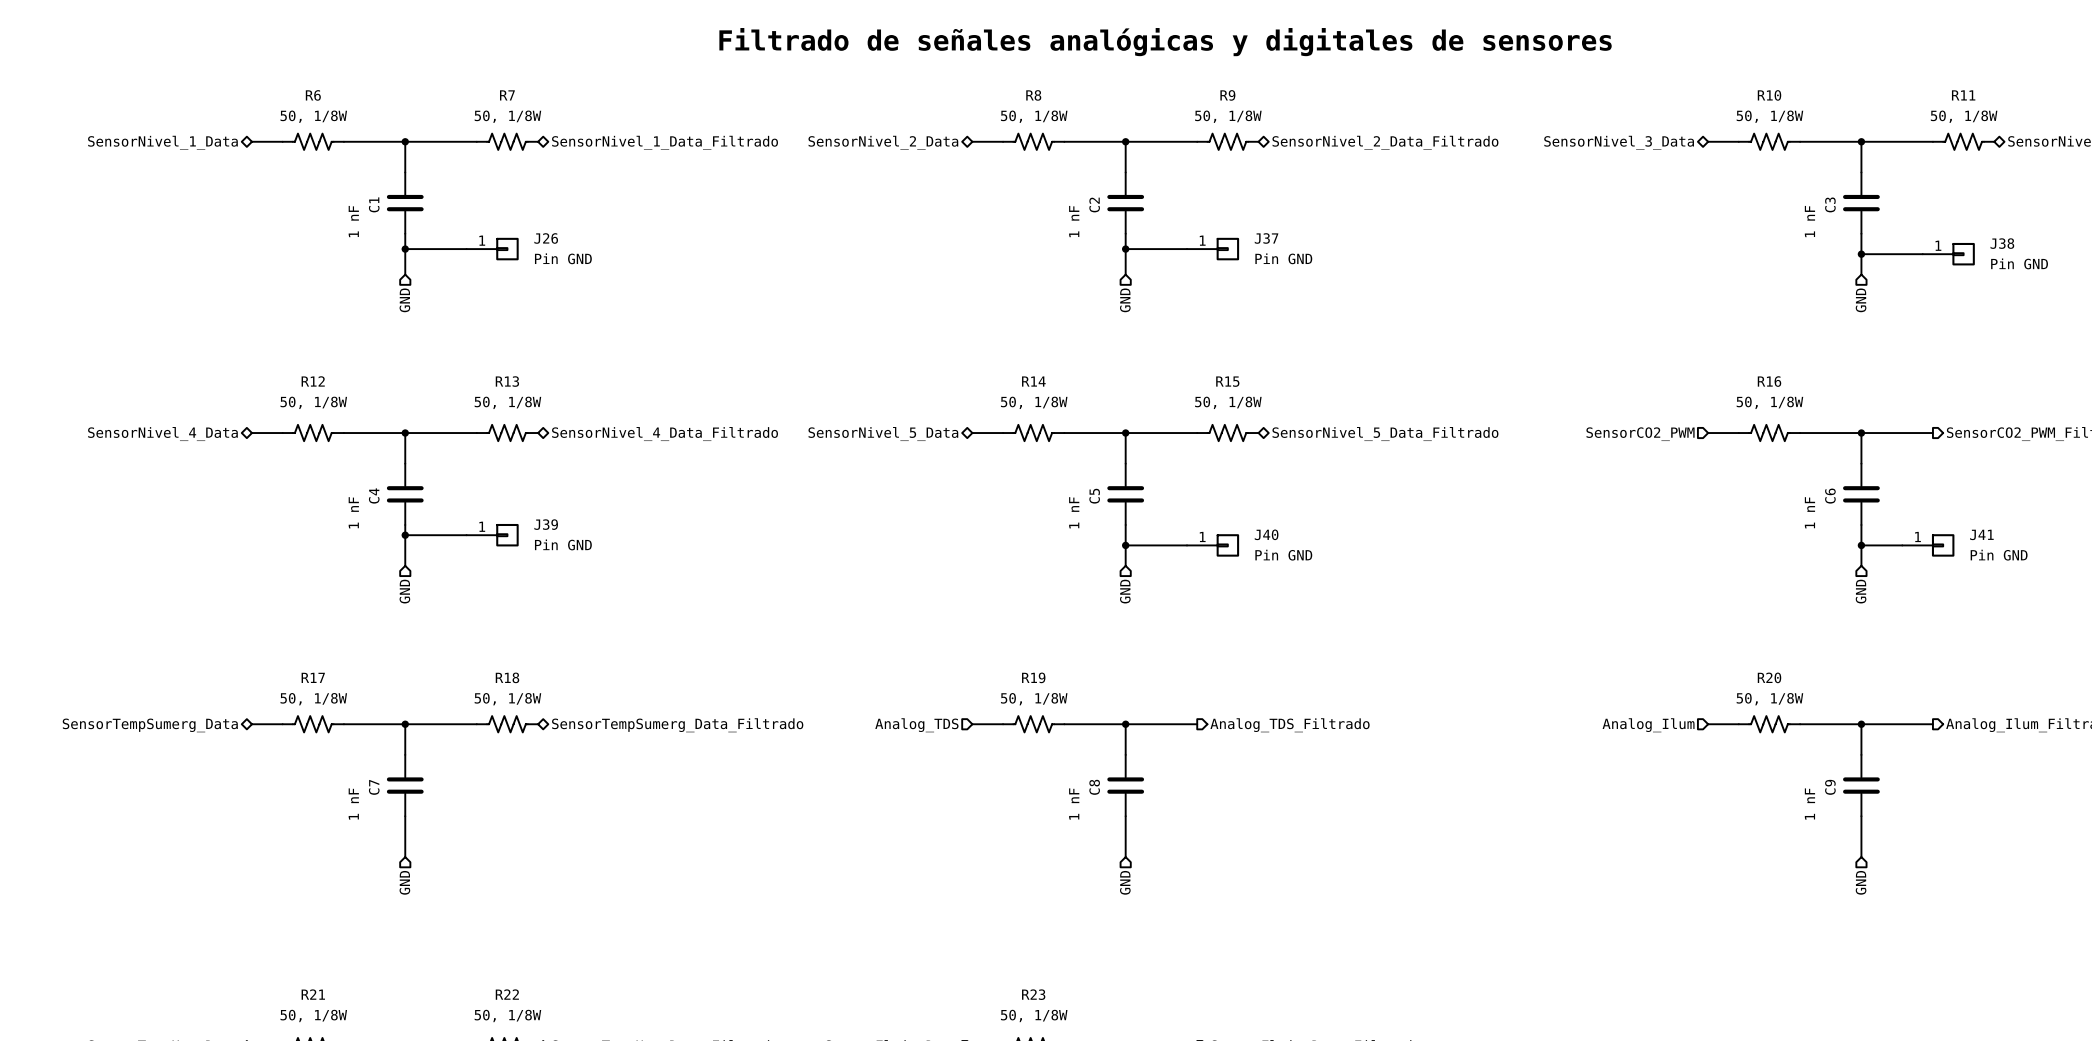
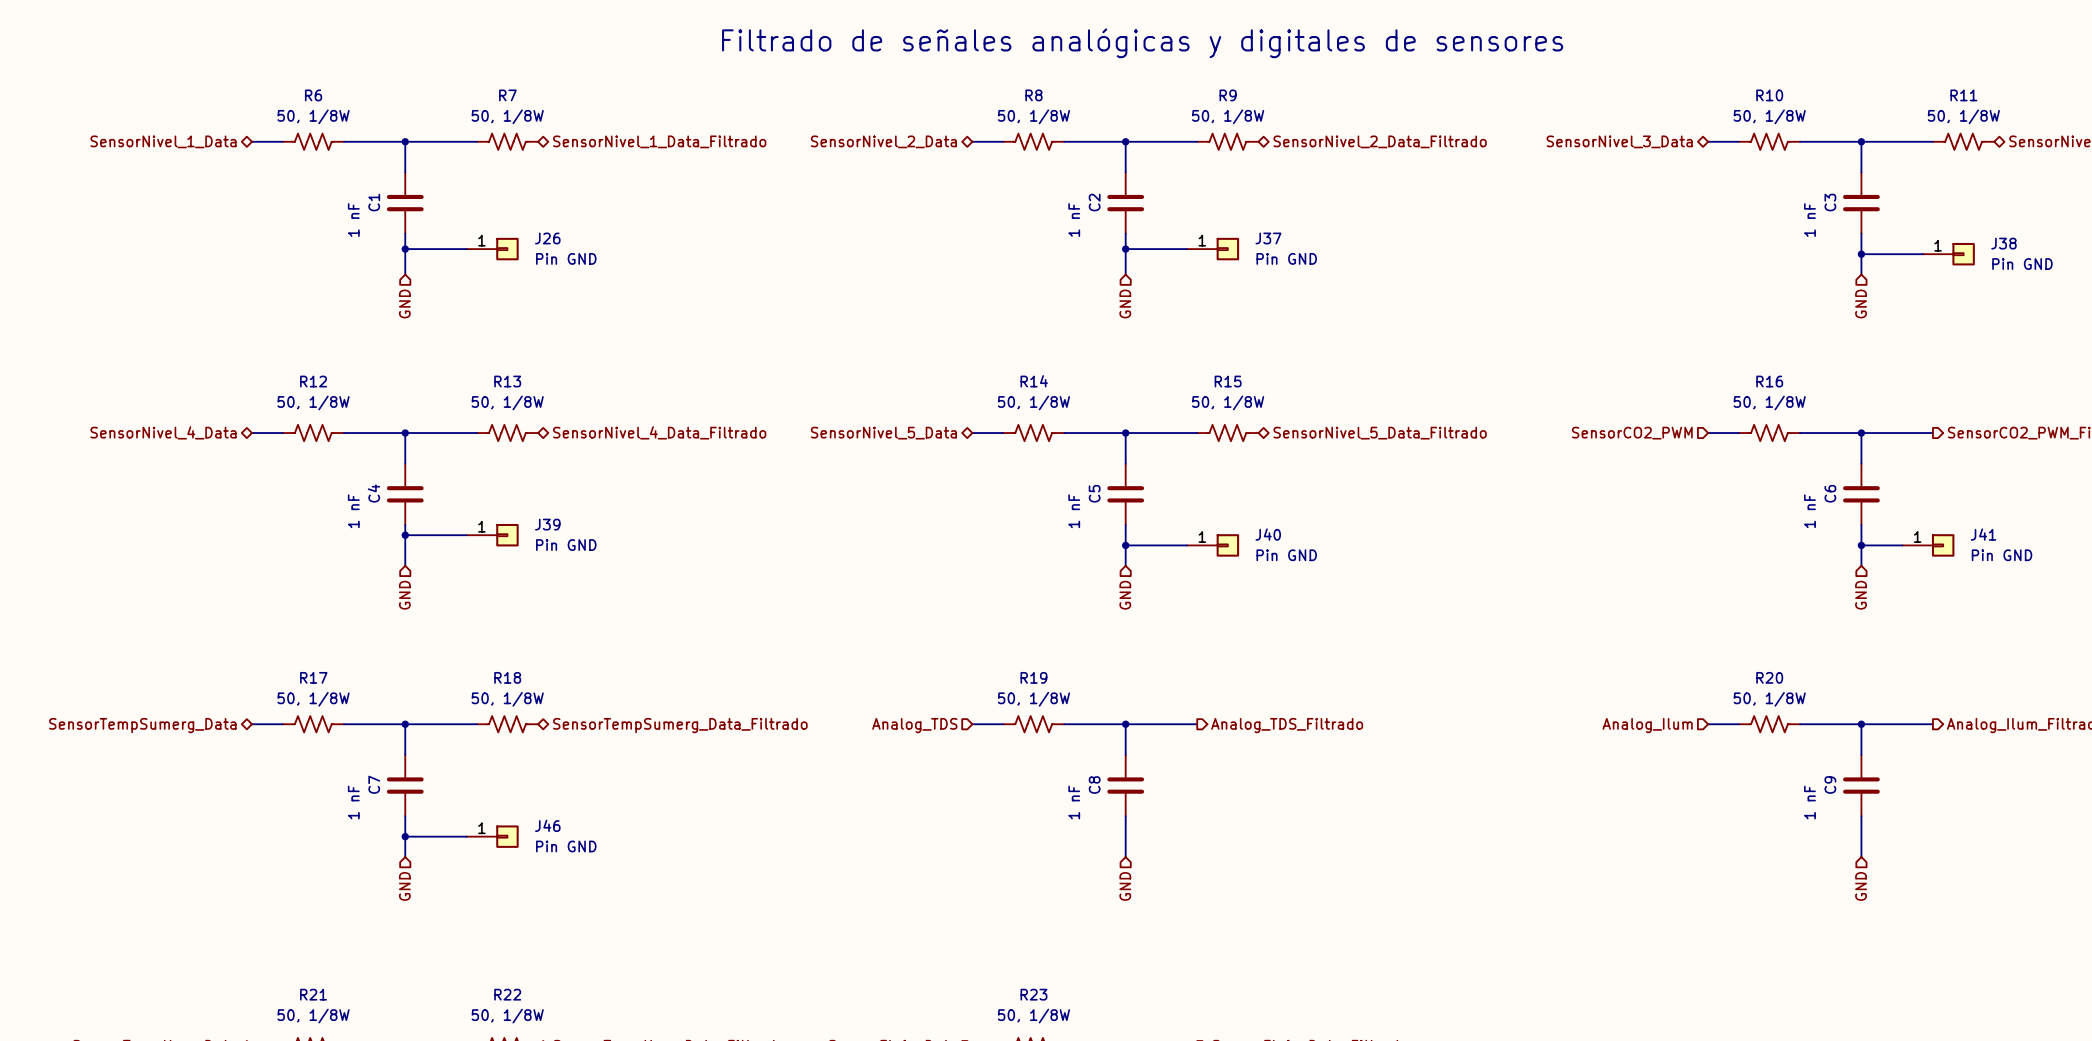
wire: none -> (405, 836) (466, 836)
junction: none -> (405, 836)
J46: none -> Pin GND (492, 836)

